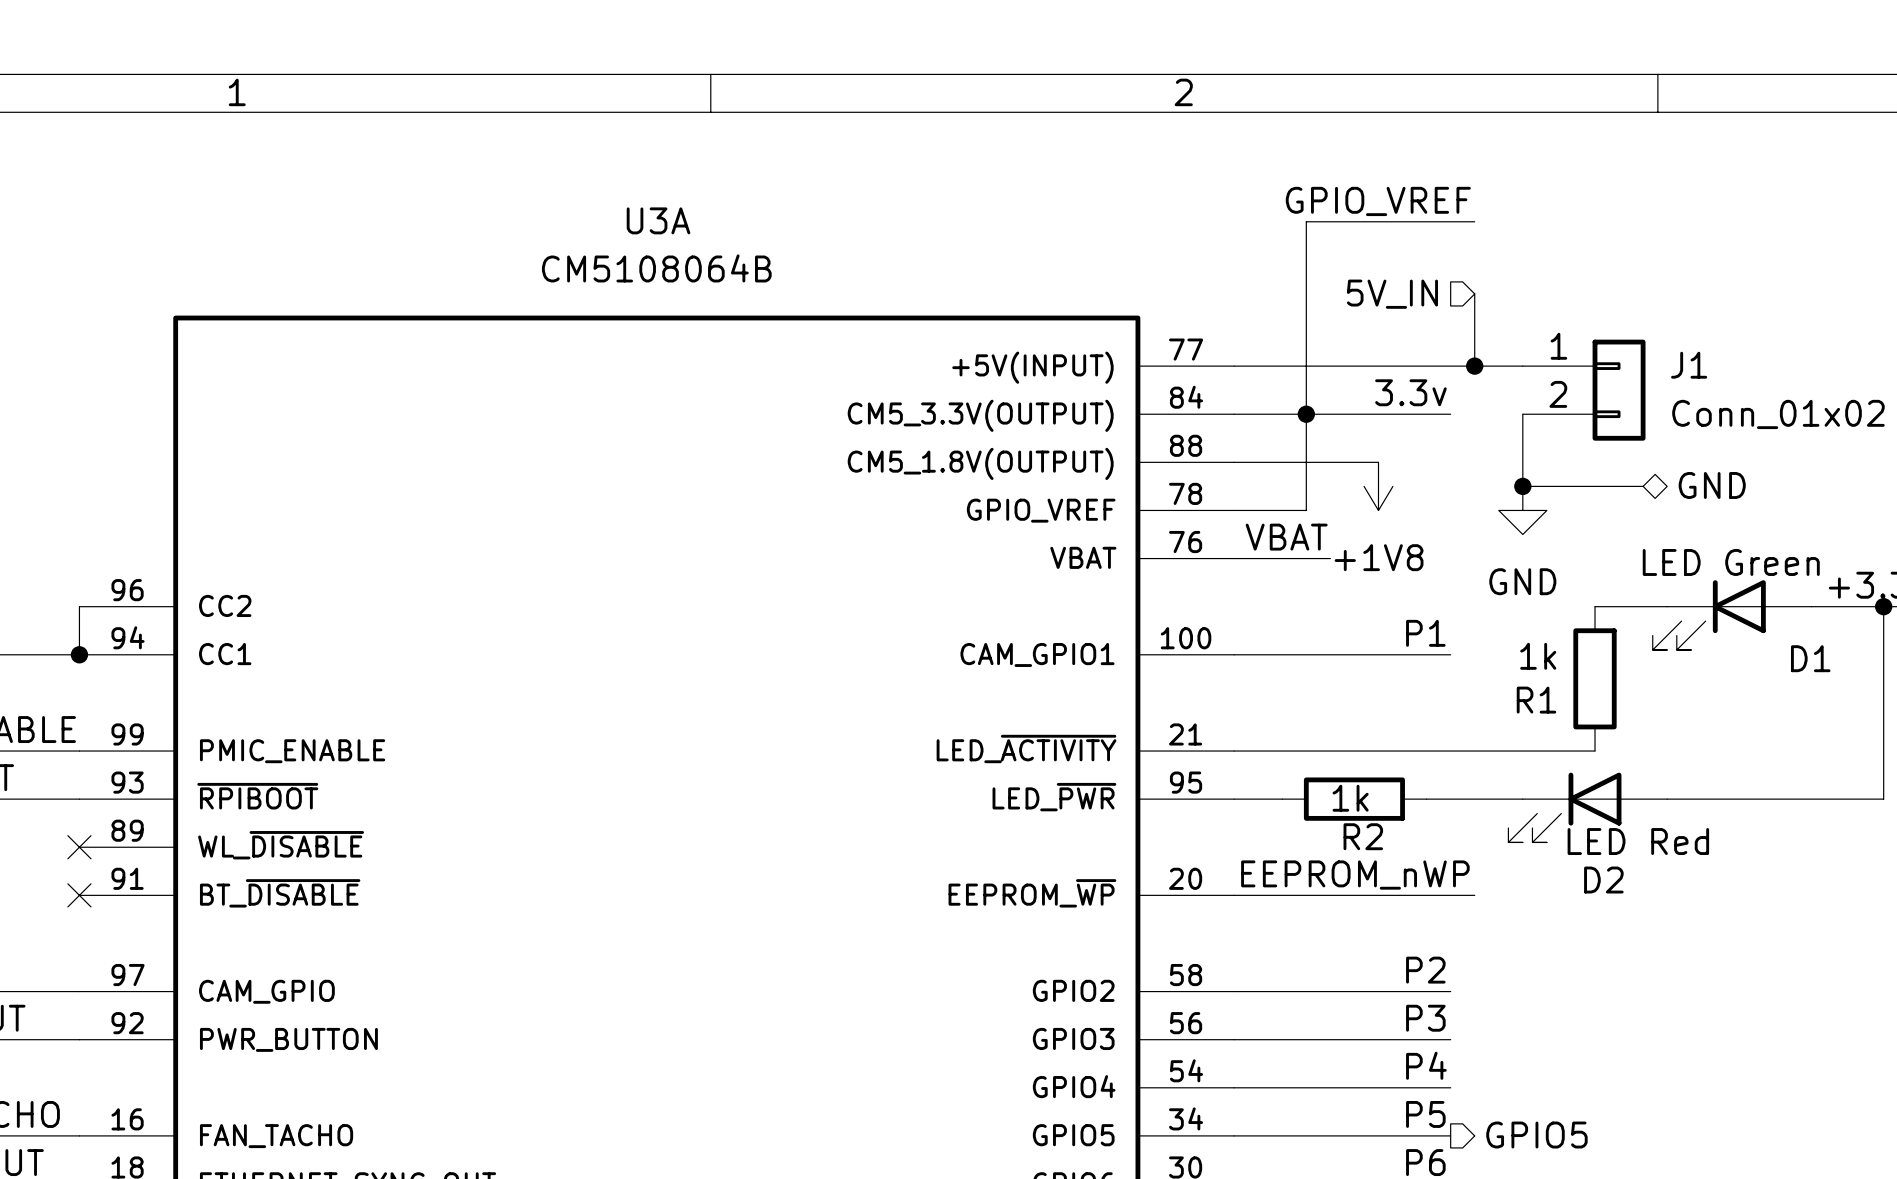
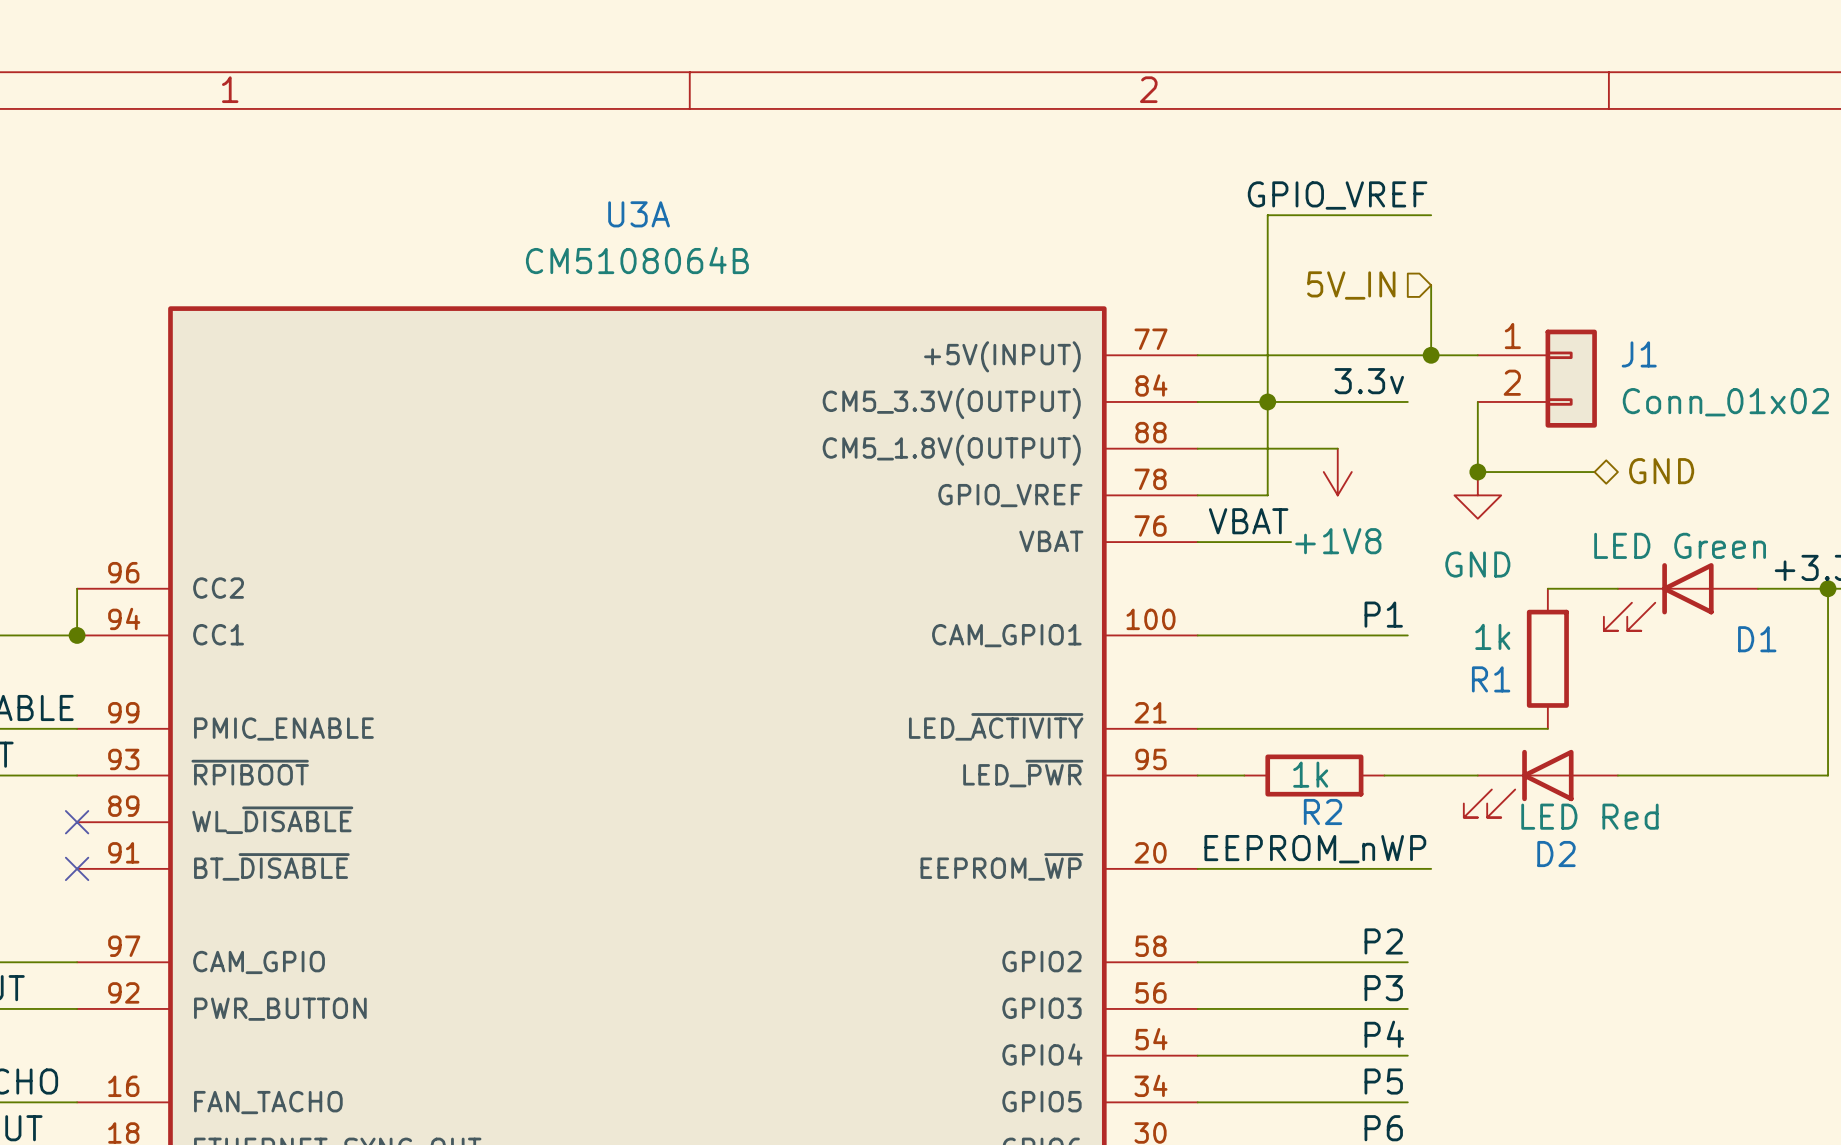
hierarchical label: GPIO5 (1536, 1135) -> none

